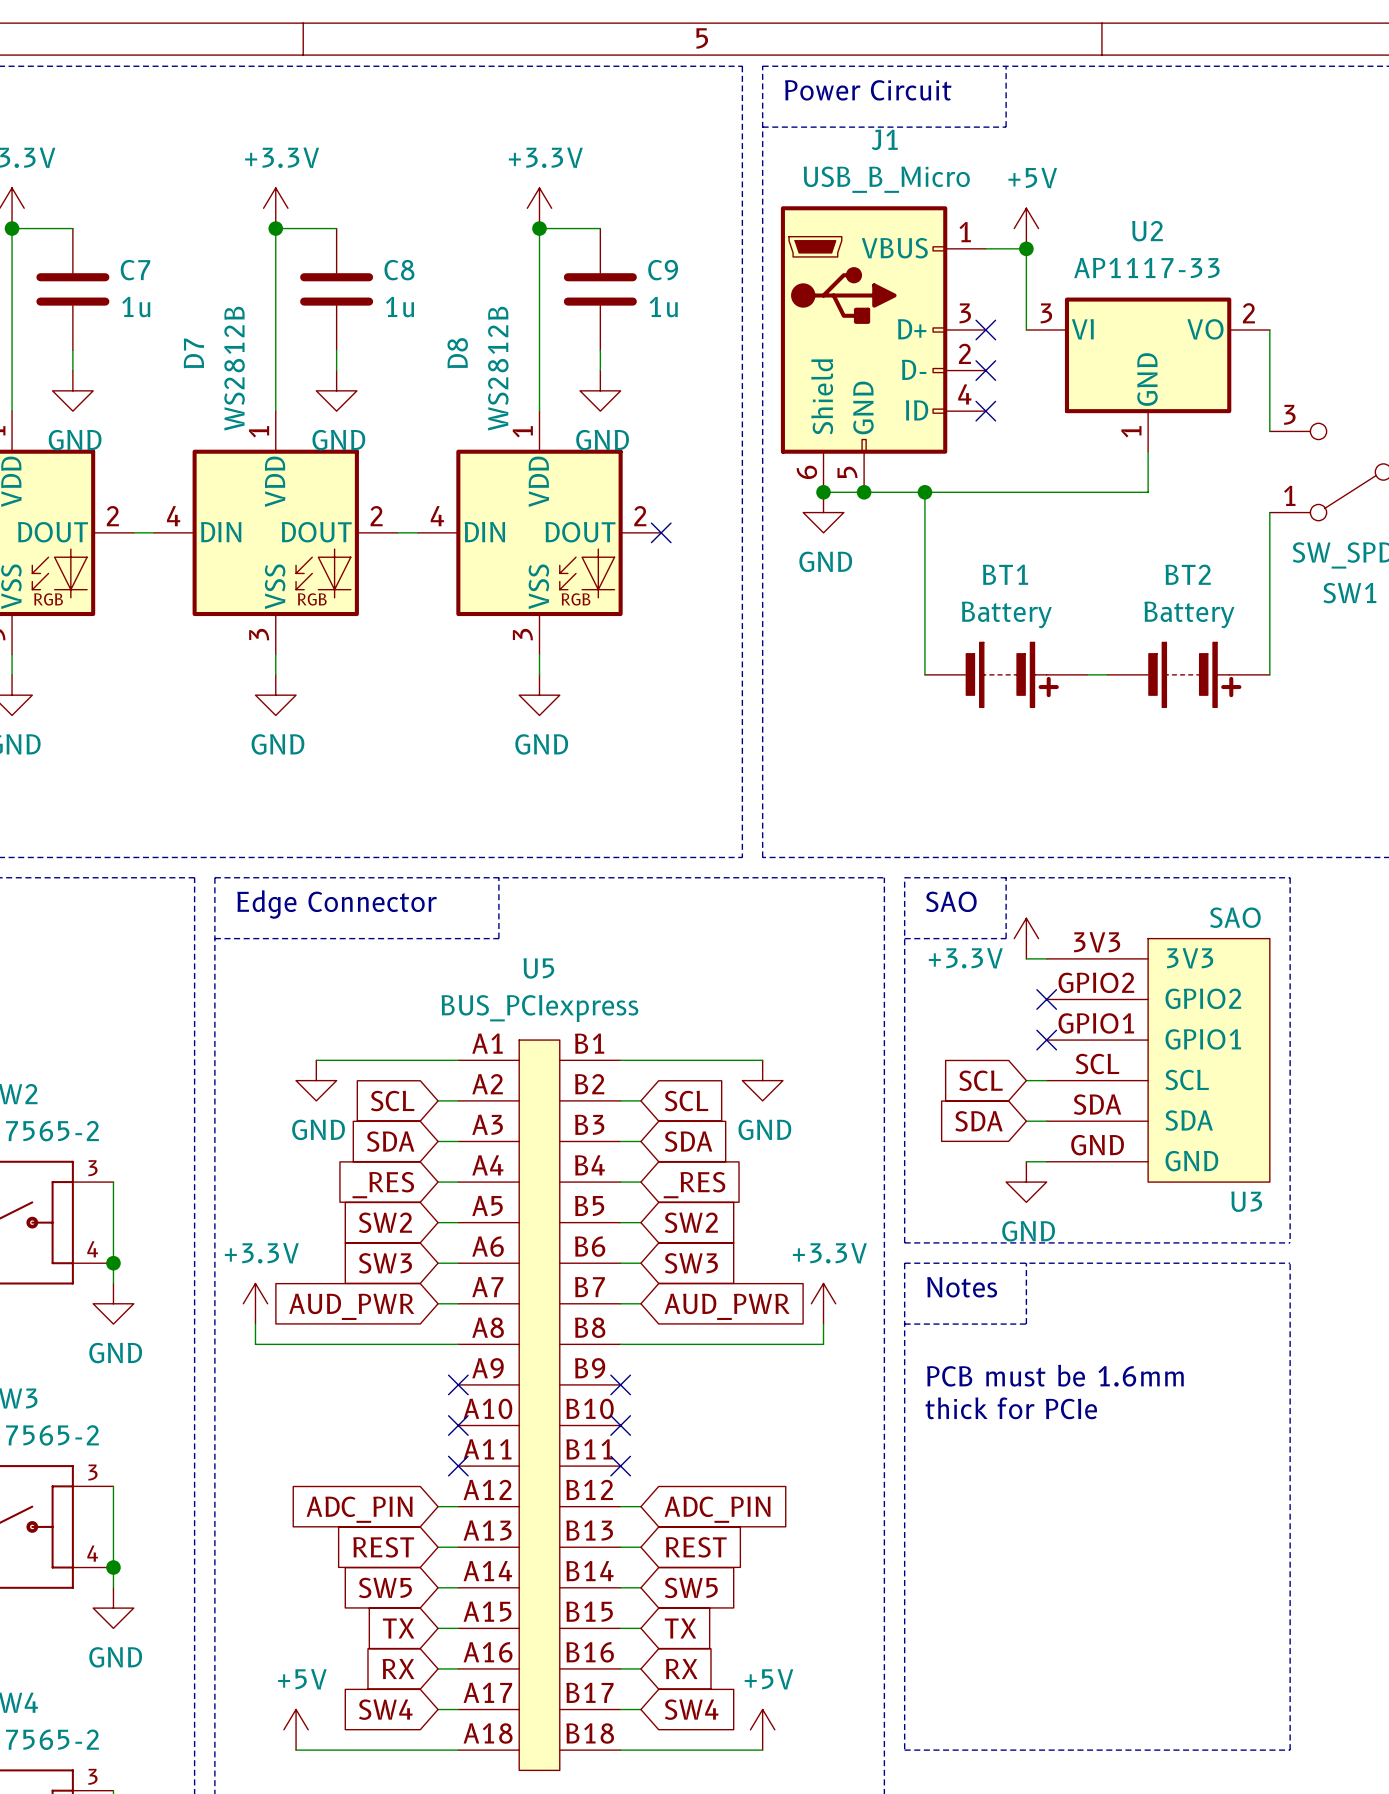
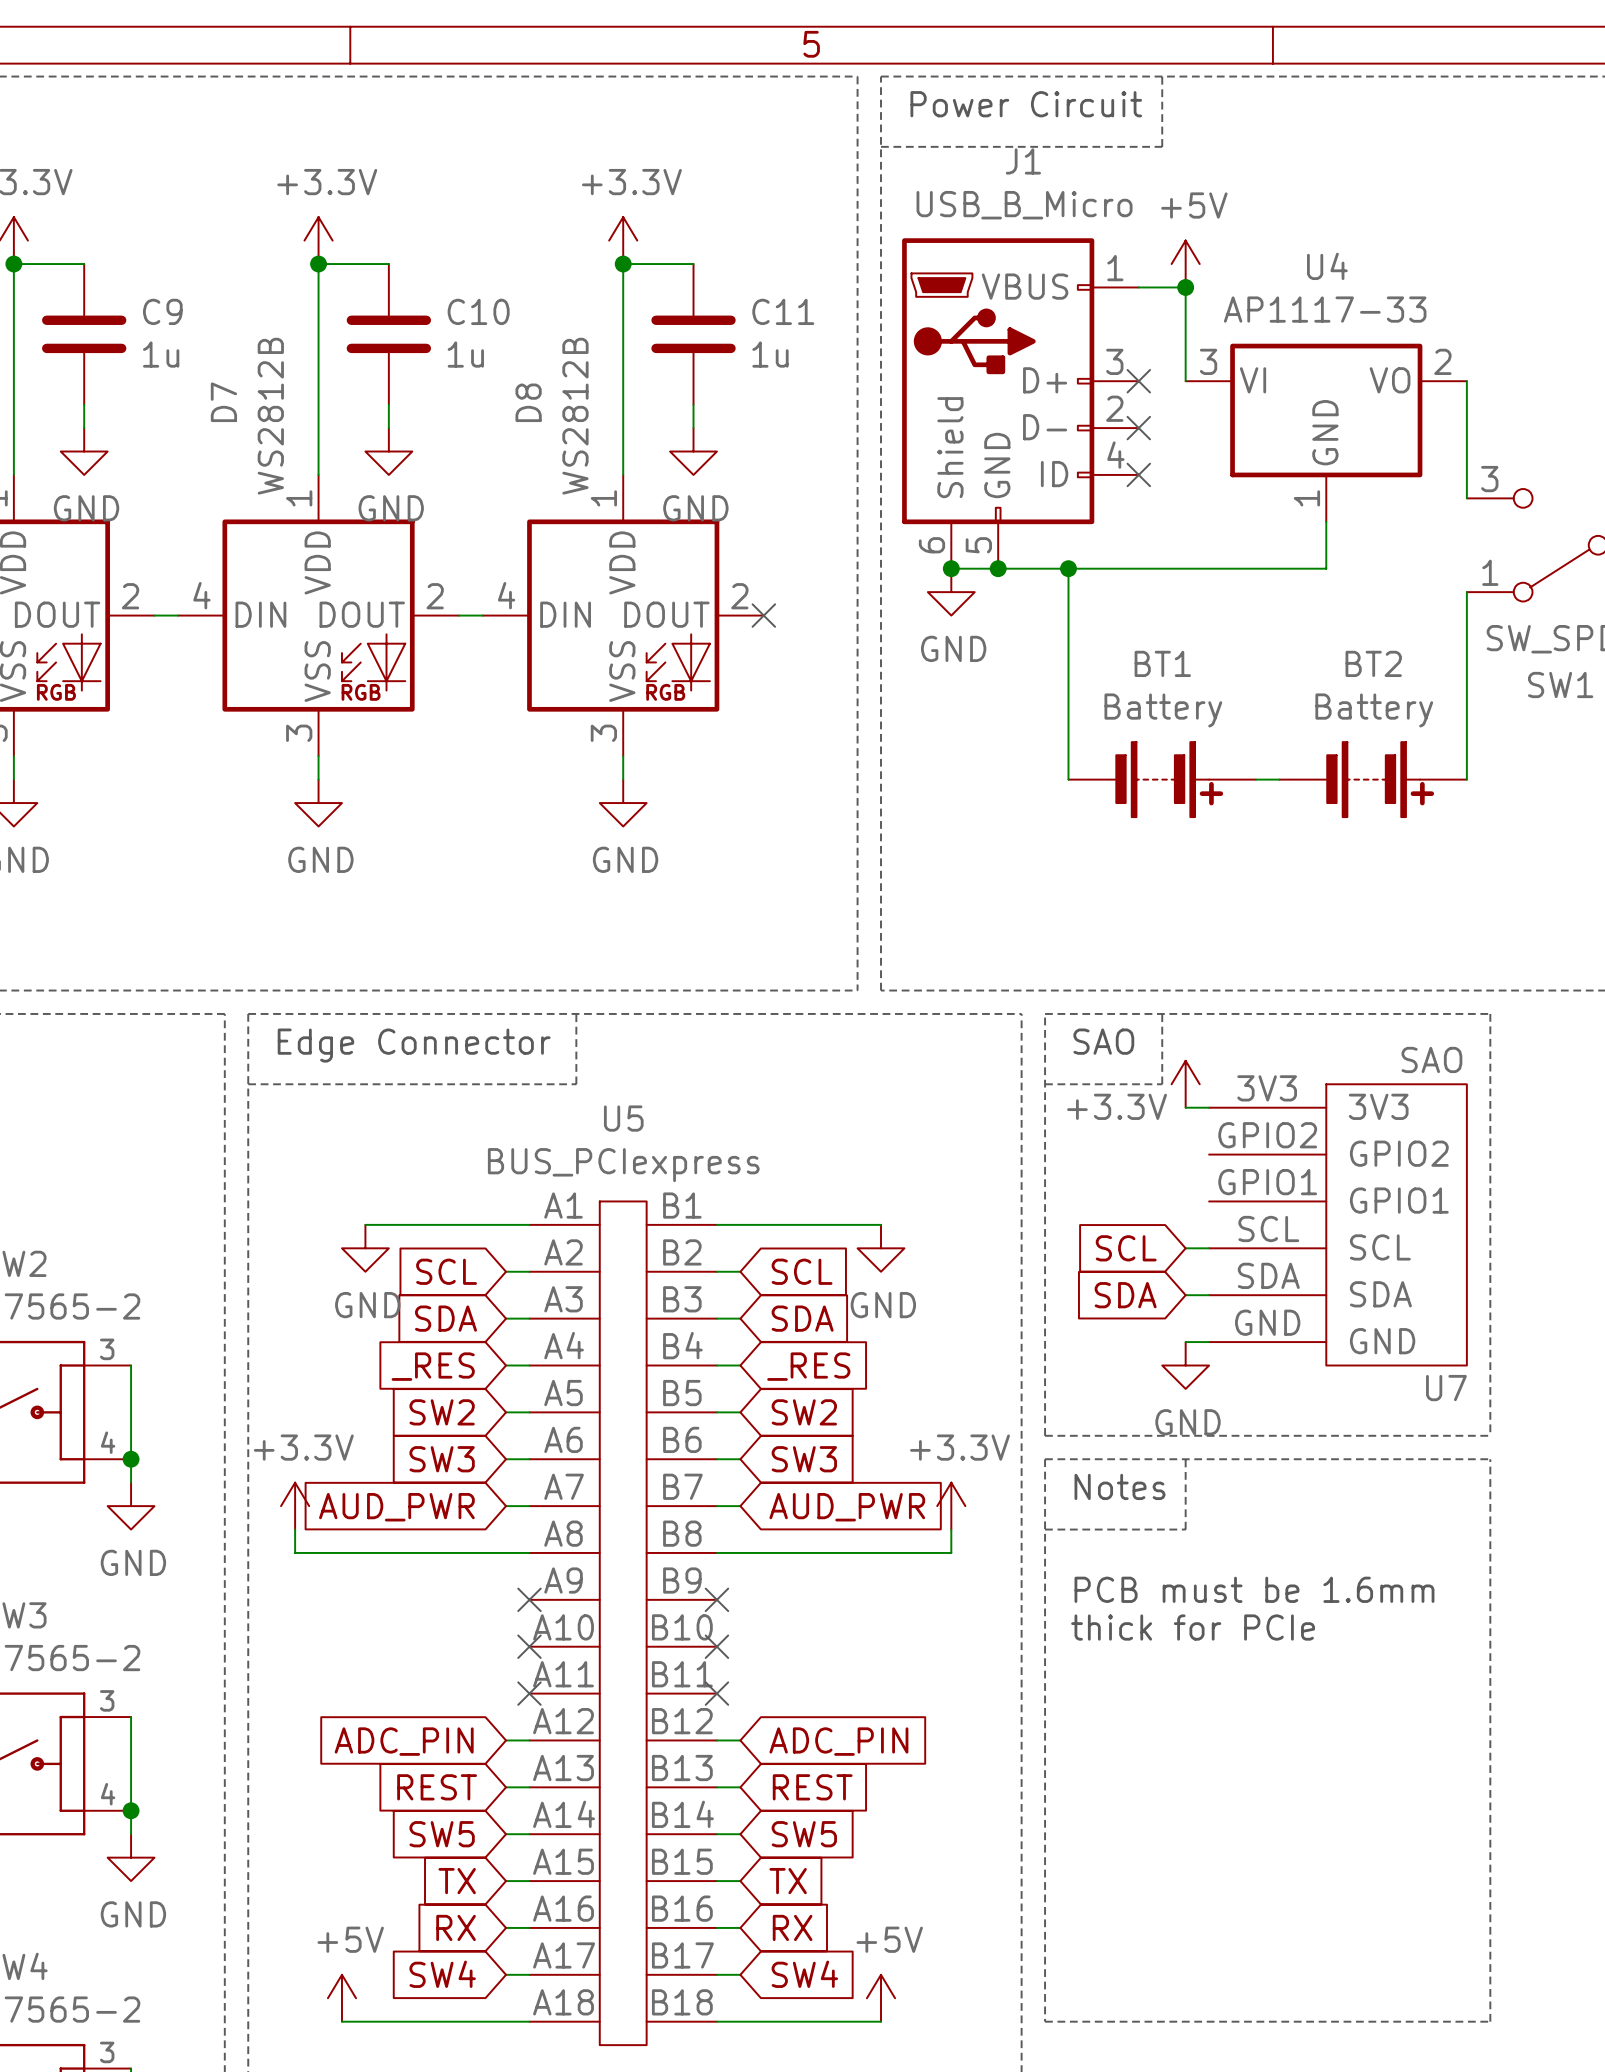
U2 name: U2 (1147, 231) -> U4 (1327, 266)
C7 name: C7 (135, 270) -> C9 (162, 311)
C8 name: C8 (399, 270) -> C10 (478, 311)
C9 name: C9 (663, 270) -> C11 (783, 311)
no-connect mark: (1046, 999) -> none
no-connect mark: (1046, 1040) -> none
U3 name: U3 (1246, 1201) -> U7 (1446, 1388)

